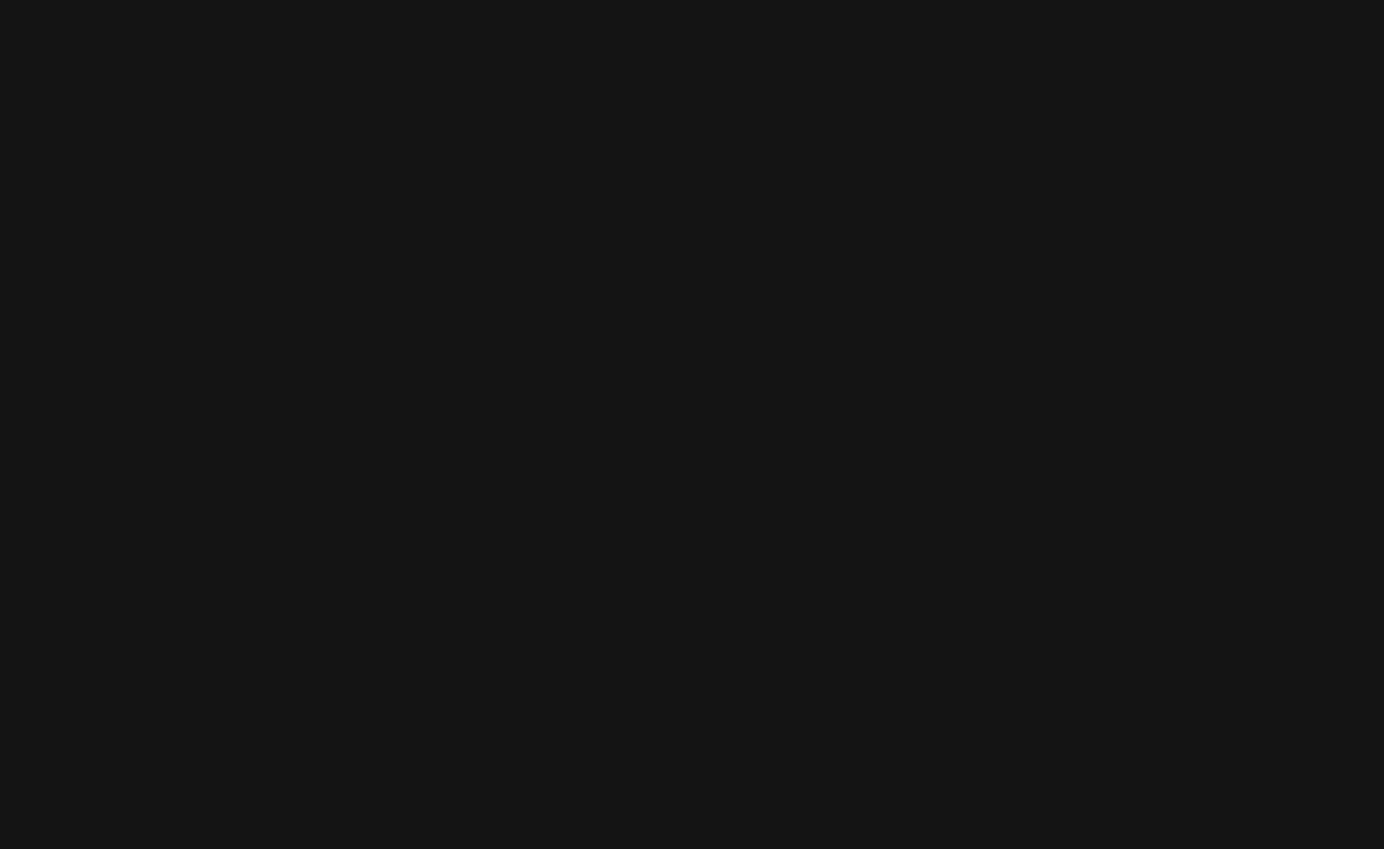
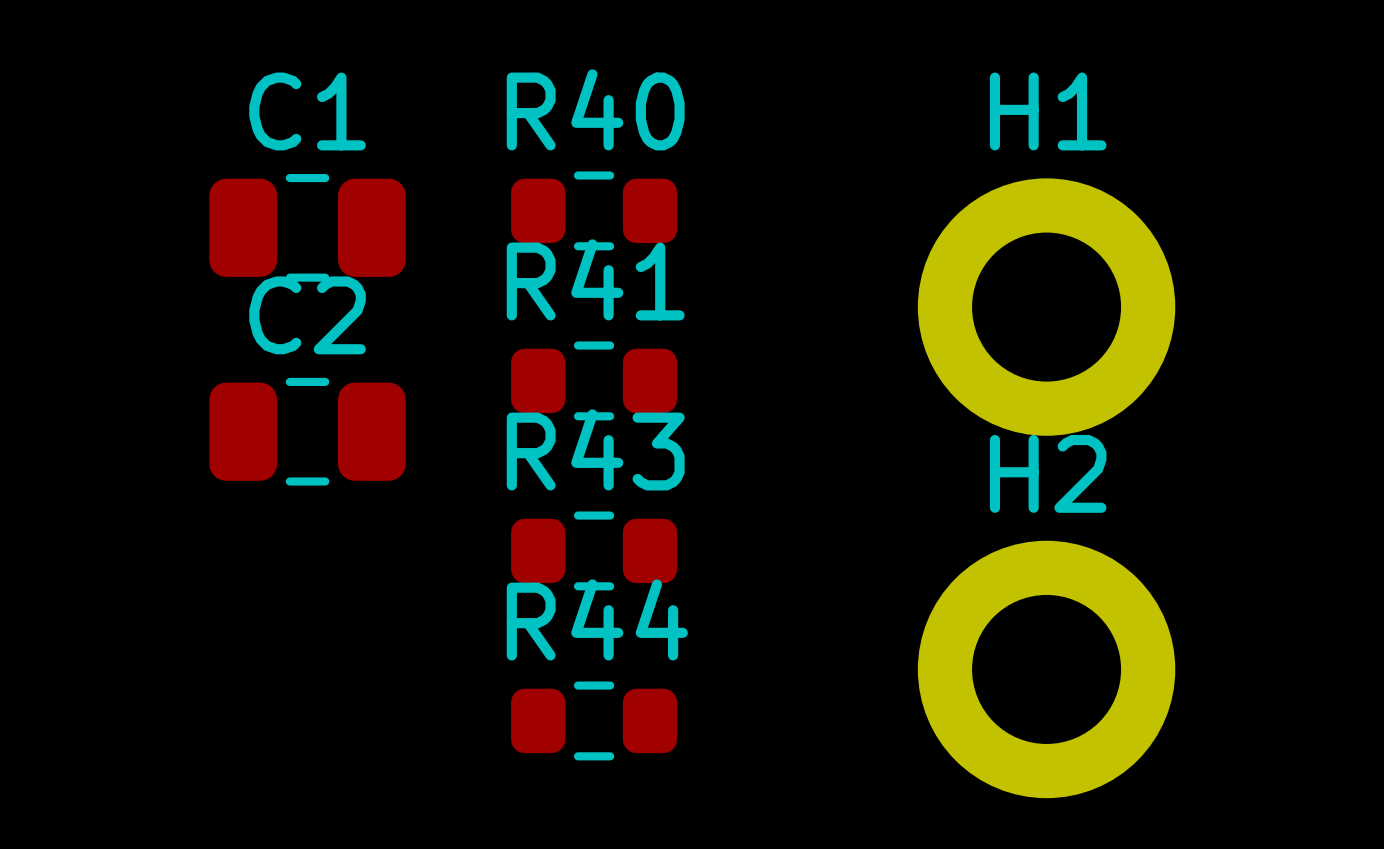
R40: none -> (594, 210)
C1: none -> (307, 227)
H1: none -> (1046, 307)
R41: none -> (594, 380)
C2: none -> (307, 431)
R43: none -> (594, 550)
H2: none -> (1046, 669)
R44: none -> (594, 720)

